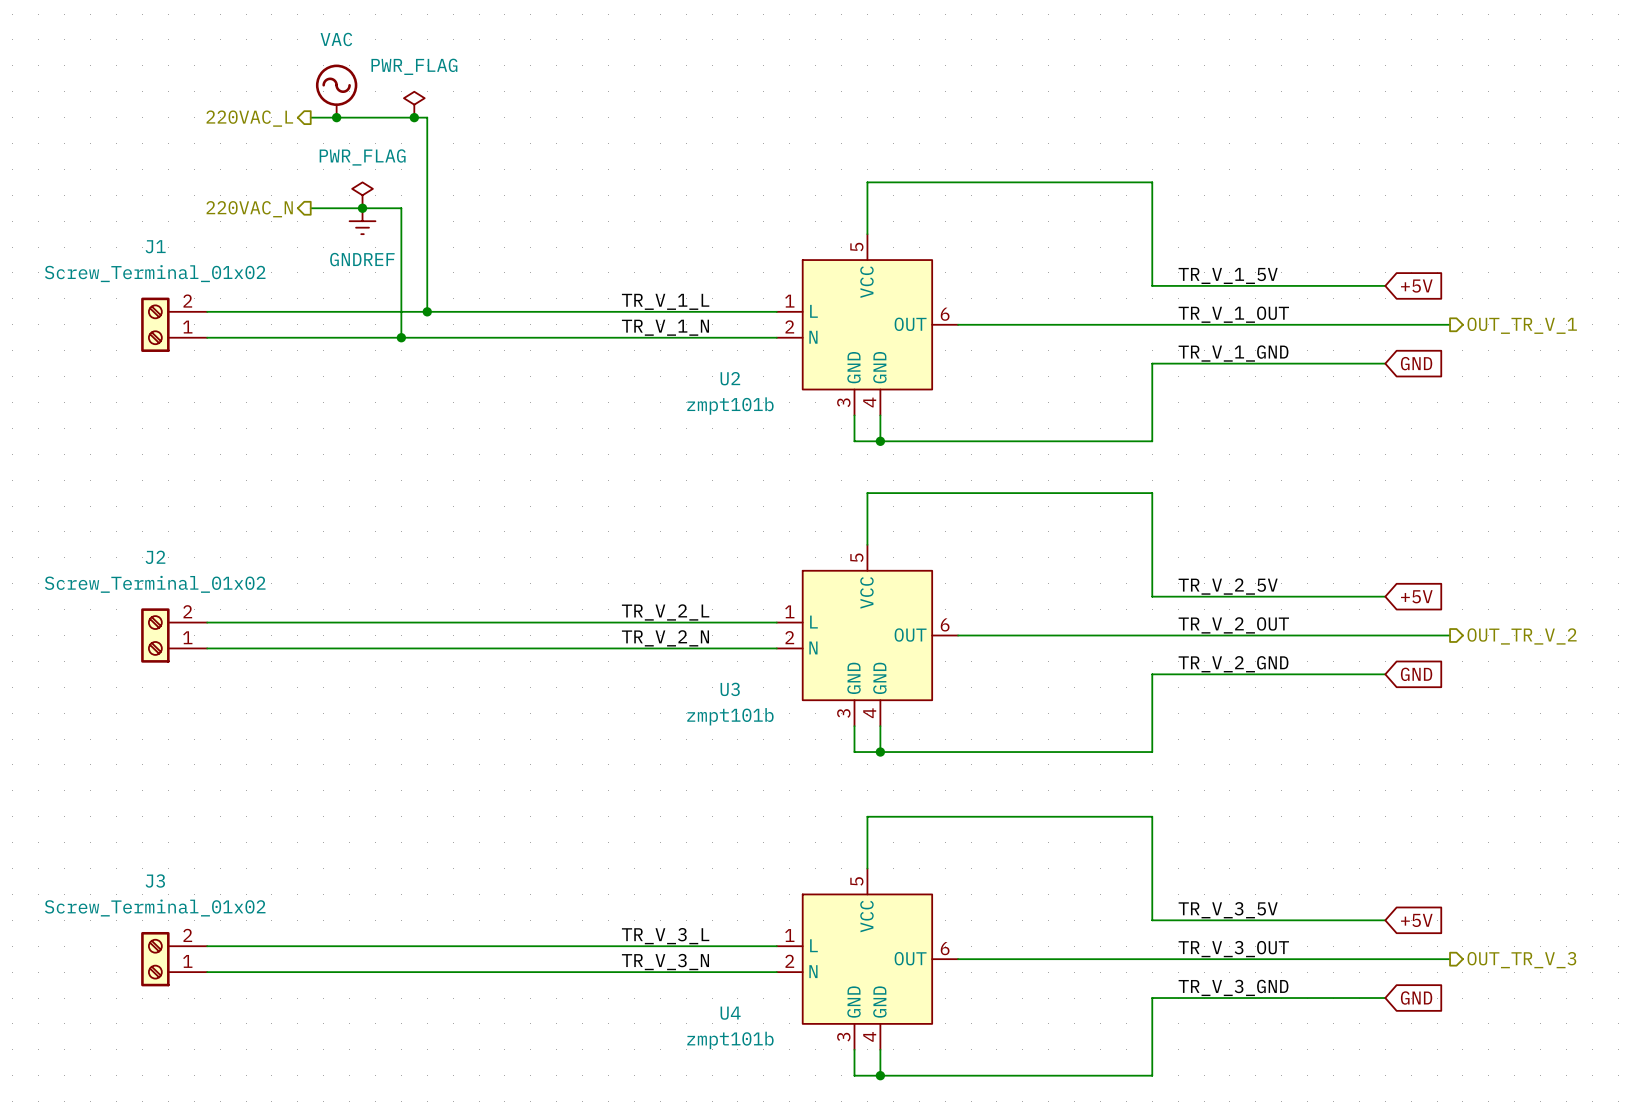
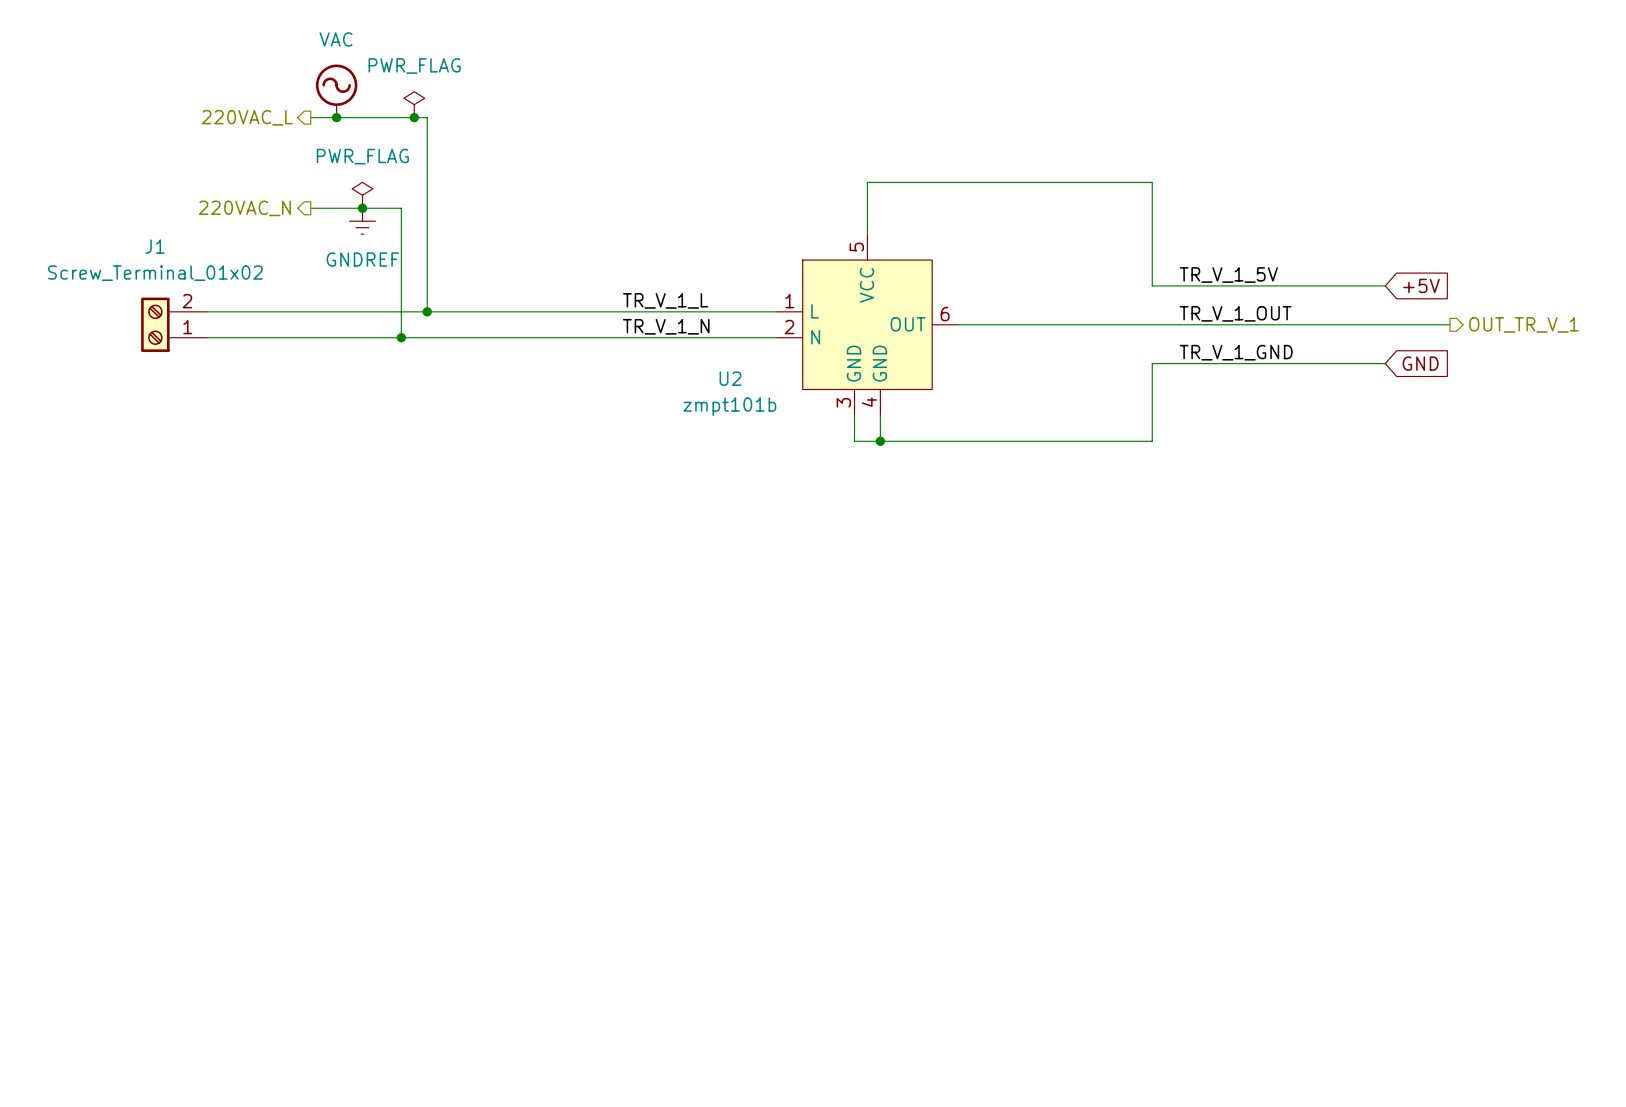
wire: (867, 544) (867, 493) (1152, 493) (1152, 596) (1385, 596) -> none
label: TR_V_2_5V (1228, 586) -> none
global label: +5V (1416, 596) -> none
U3: zmpt101b (938, 603) -> none
label: TR_V_2_L (665, 612) -> none
wire: (207, 622) (776, 622) -> none
label: TR_V_2_OUT (1233, 625) -> none
J2: Screw_Terminal_01x02 (174, 635) -> none
wire: (958, 635) (1450, 635) -> none
hierarchical label: OUT_TR_V_2 (1522, 636) -> none
label: TR_V_2_N (665, 638) -> none
wire: (207, 648) (776, 648) -> none
label: TR_V_2_GND (1233, 664) -> none
wire: (1385, 674) (1152, 674) (1152, 752) (854, 752) (854, 726) -> none
global label: GND (1416, 674) -> none
wire: (880, 726) (880, 752) -> none
junction: (880, 752) -> none
wire: (867, 868) (867, 816) (1152, 816) (1152, 920) (1385, 920) -> none
label: TR_V_3_5V (1228, 910) -> none
global label: +5V (1416, 920) -> none
U4: zmpt101b (938, 926) -> none
label: TR_V_3_L (665, 936) -> none
wire: (207, 946) (776, 946) -> none
label: TR_V_3_OUT (1233, 949) -> none
J3: Screw_Terminal_01x02 (174, 959) -> none
wire: (958, 959) (1450, 959) -> none
hierarchical label: OUT_TR_V_3 (1521, 960) -> none
label: TR_V_3_N (665, 962) -> none
wire: (207, 972) (776, 972) -> none
label: TR_V_3_GND (1233, 987) -> none
wire: (1385, 998) (1152, 998) (1152, 1075) (854, 1075) (854, 1049) -> none
global label: GND (1416, 998) -> none
wire: (880, 1049) (880, 1075) -> none
junction: (880, 1075) -> none

